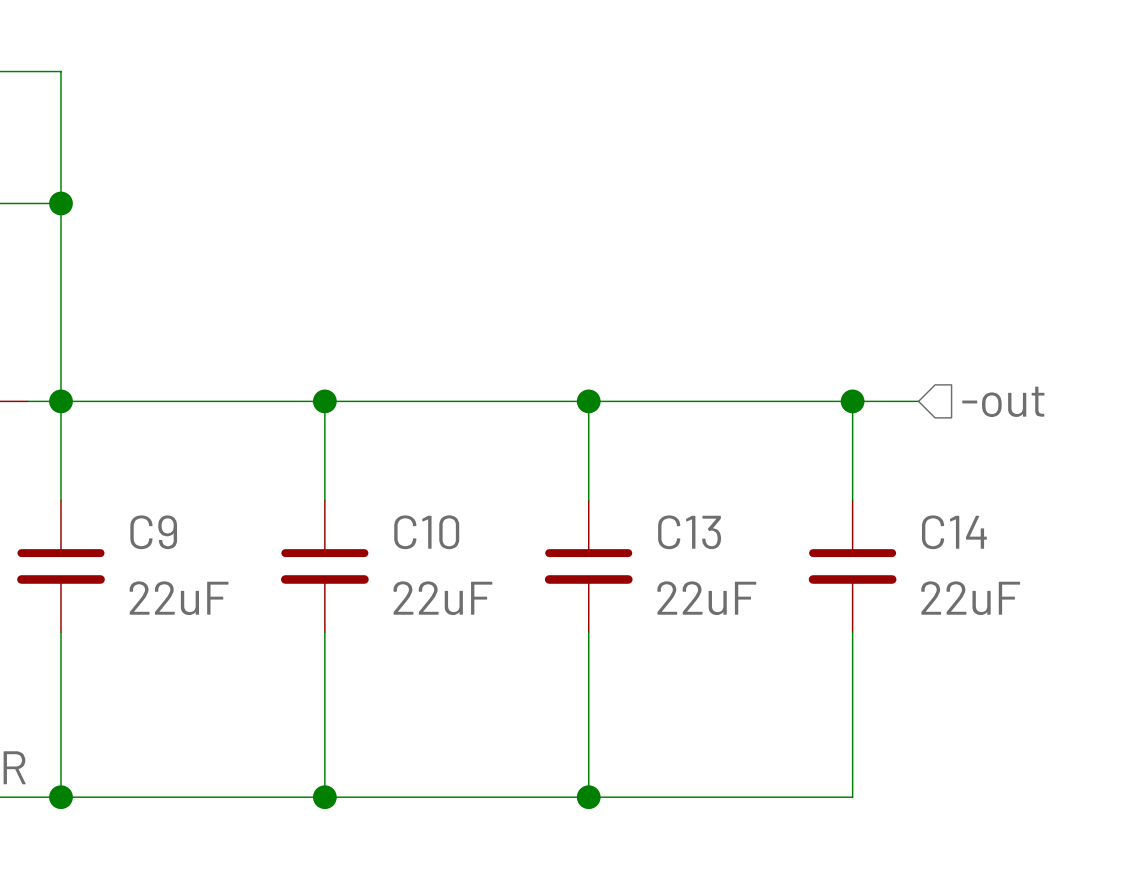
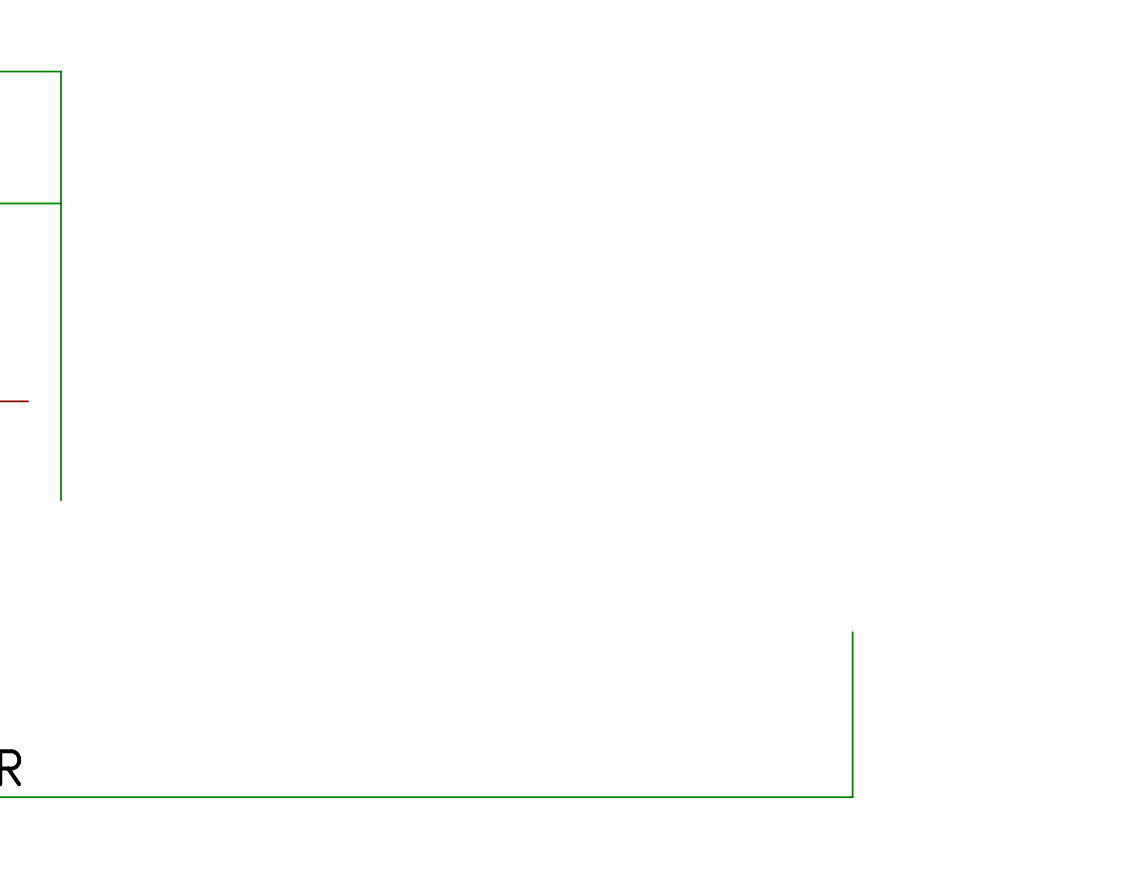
junction: (60, 203) -> none
wire: (28, 401) (918, 401) -> none
junction: (60, 401) -> none
wire: (324, 401) (324, 500) -> none
junction: (324, 401) -> none
wire: (588, 401) (588, 500) -> none
junction: (588, 401) -> none
wire: (852, 401) (852, 500) -> none
junction: (852, 401) -> none
hierarchical label: -out (1003, 401) -> none
C9: 22uF (60, 566) -> none
C10: 22uF (324, 566) -> none
C13: 22uF (588, 566) -> none
C14: 22uF (852, 566) -> none
wire: (60, 632) (60, 797) -> none
wire: (324, 632) (324, 797) -> none
wire: (588, 632) (588, 797) -> none
junction: (60, 797) -> none
junction: (324, 797) -> none
junction: (588, 797) -> none

